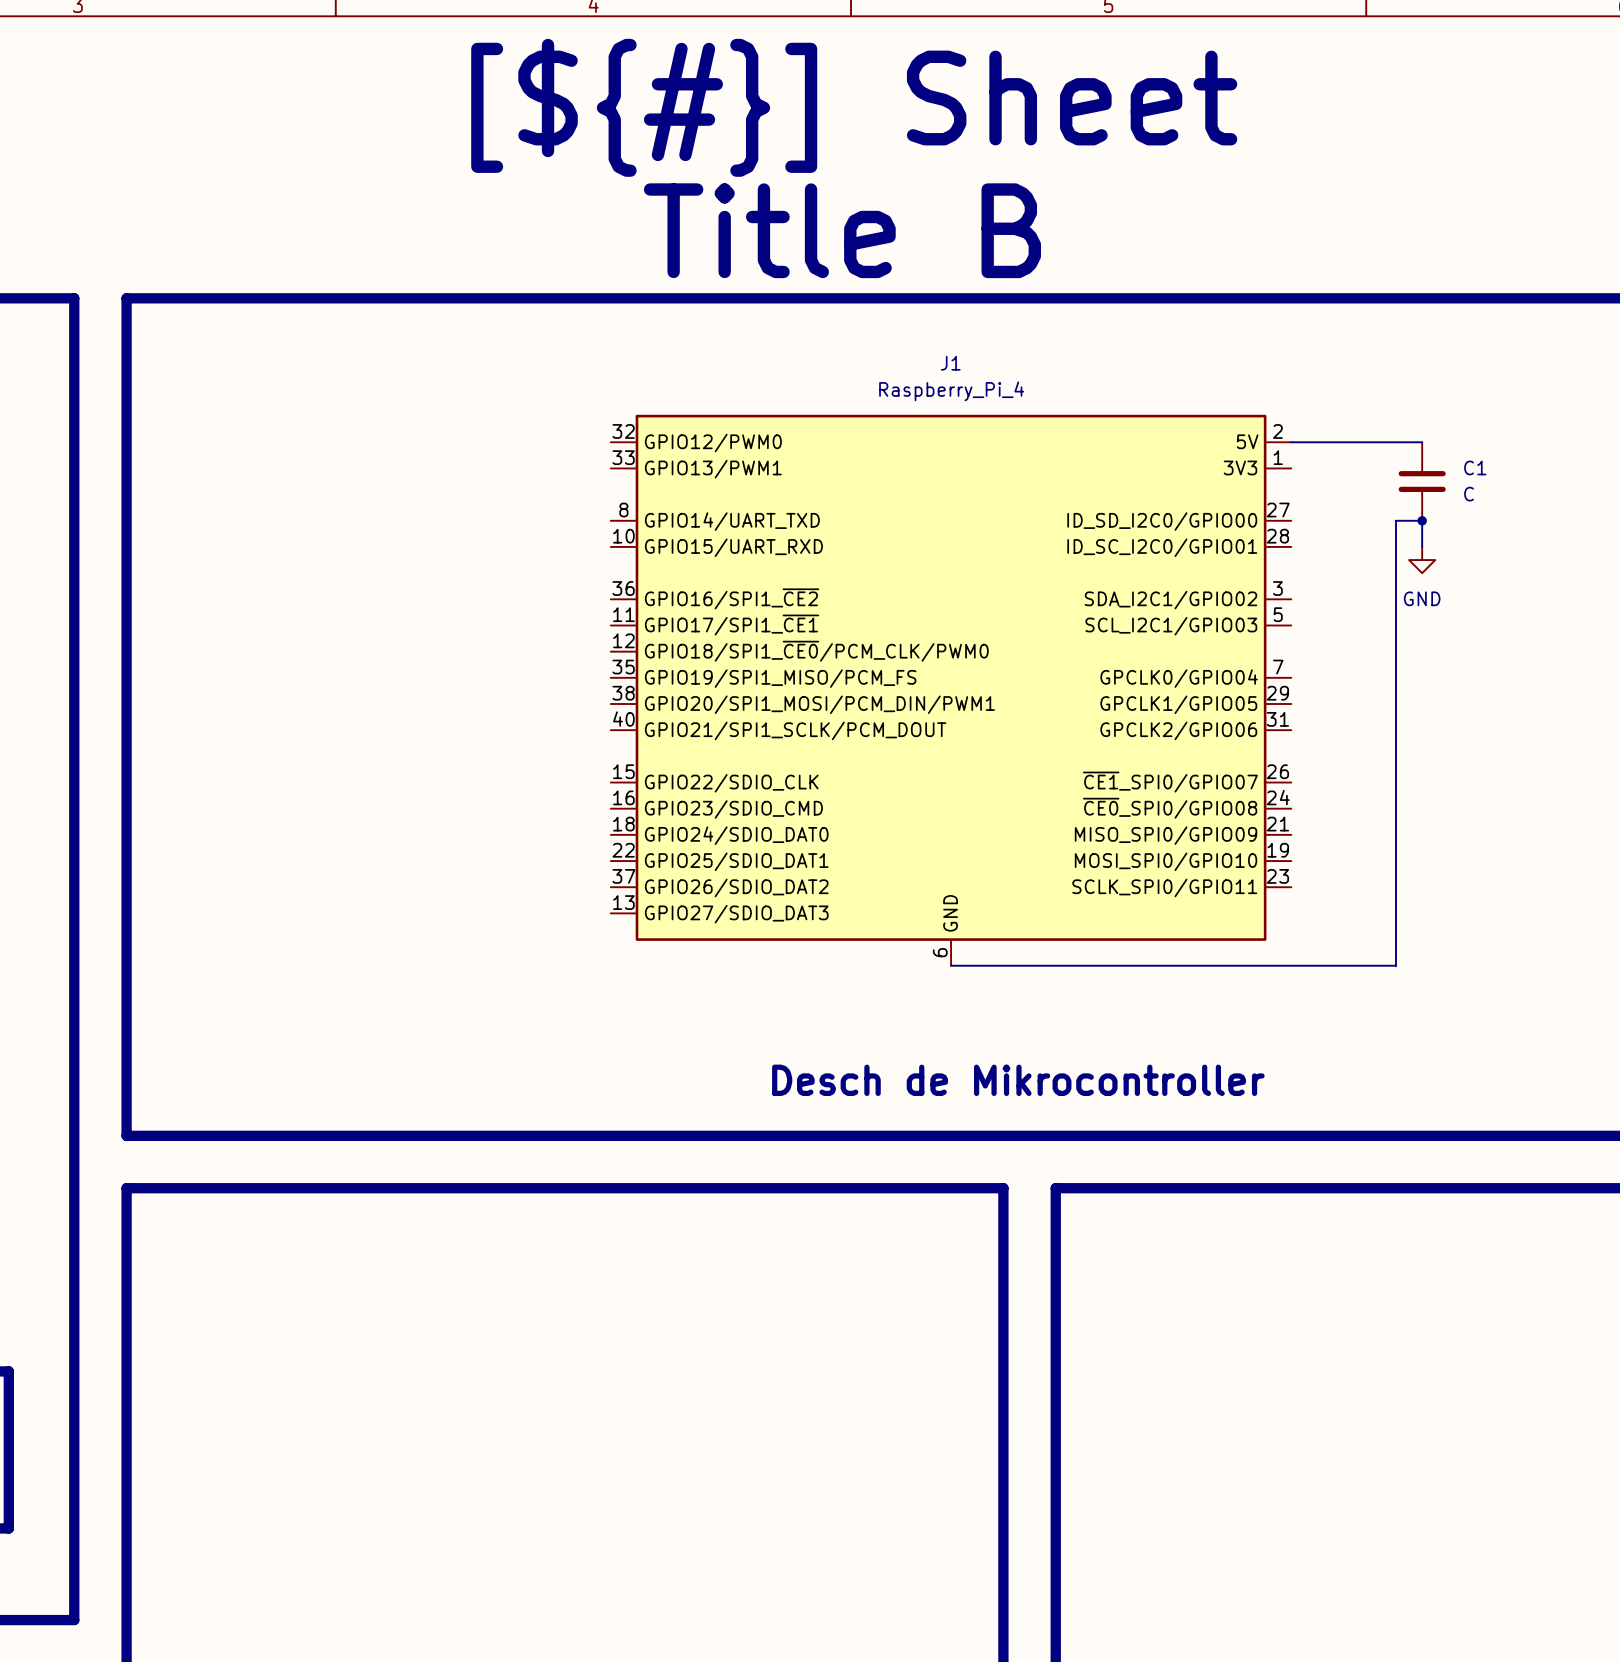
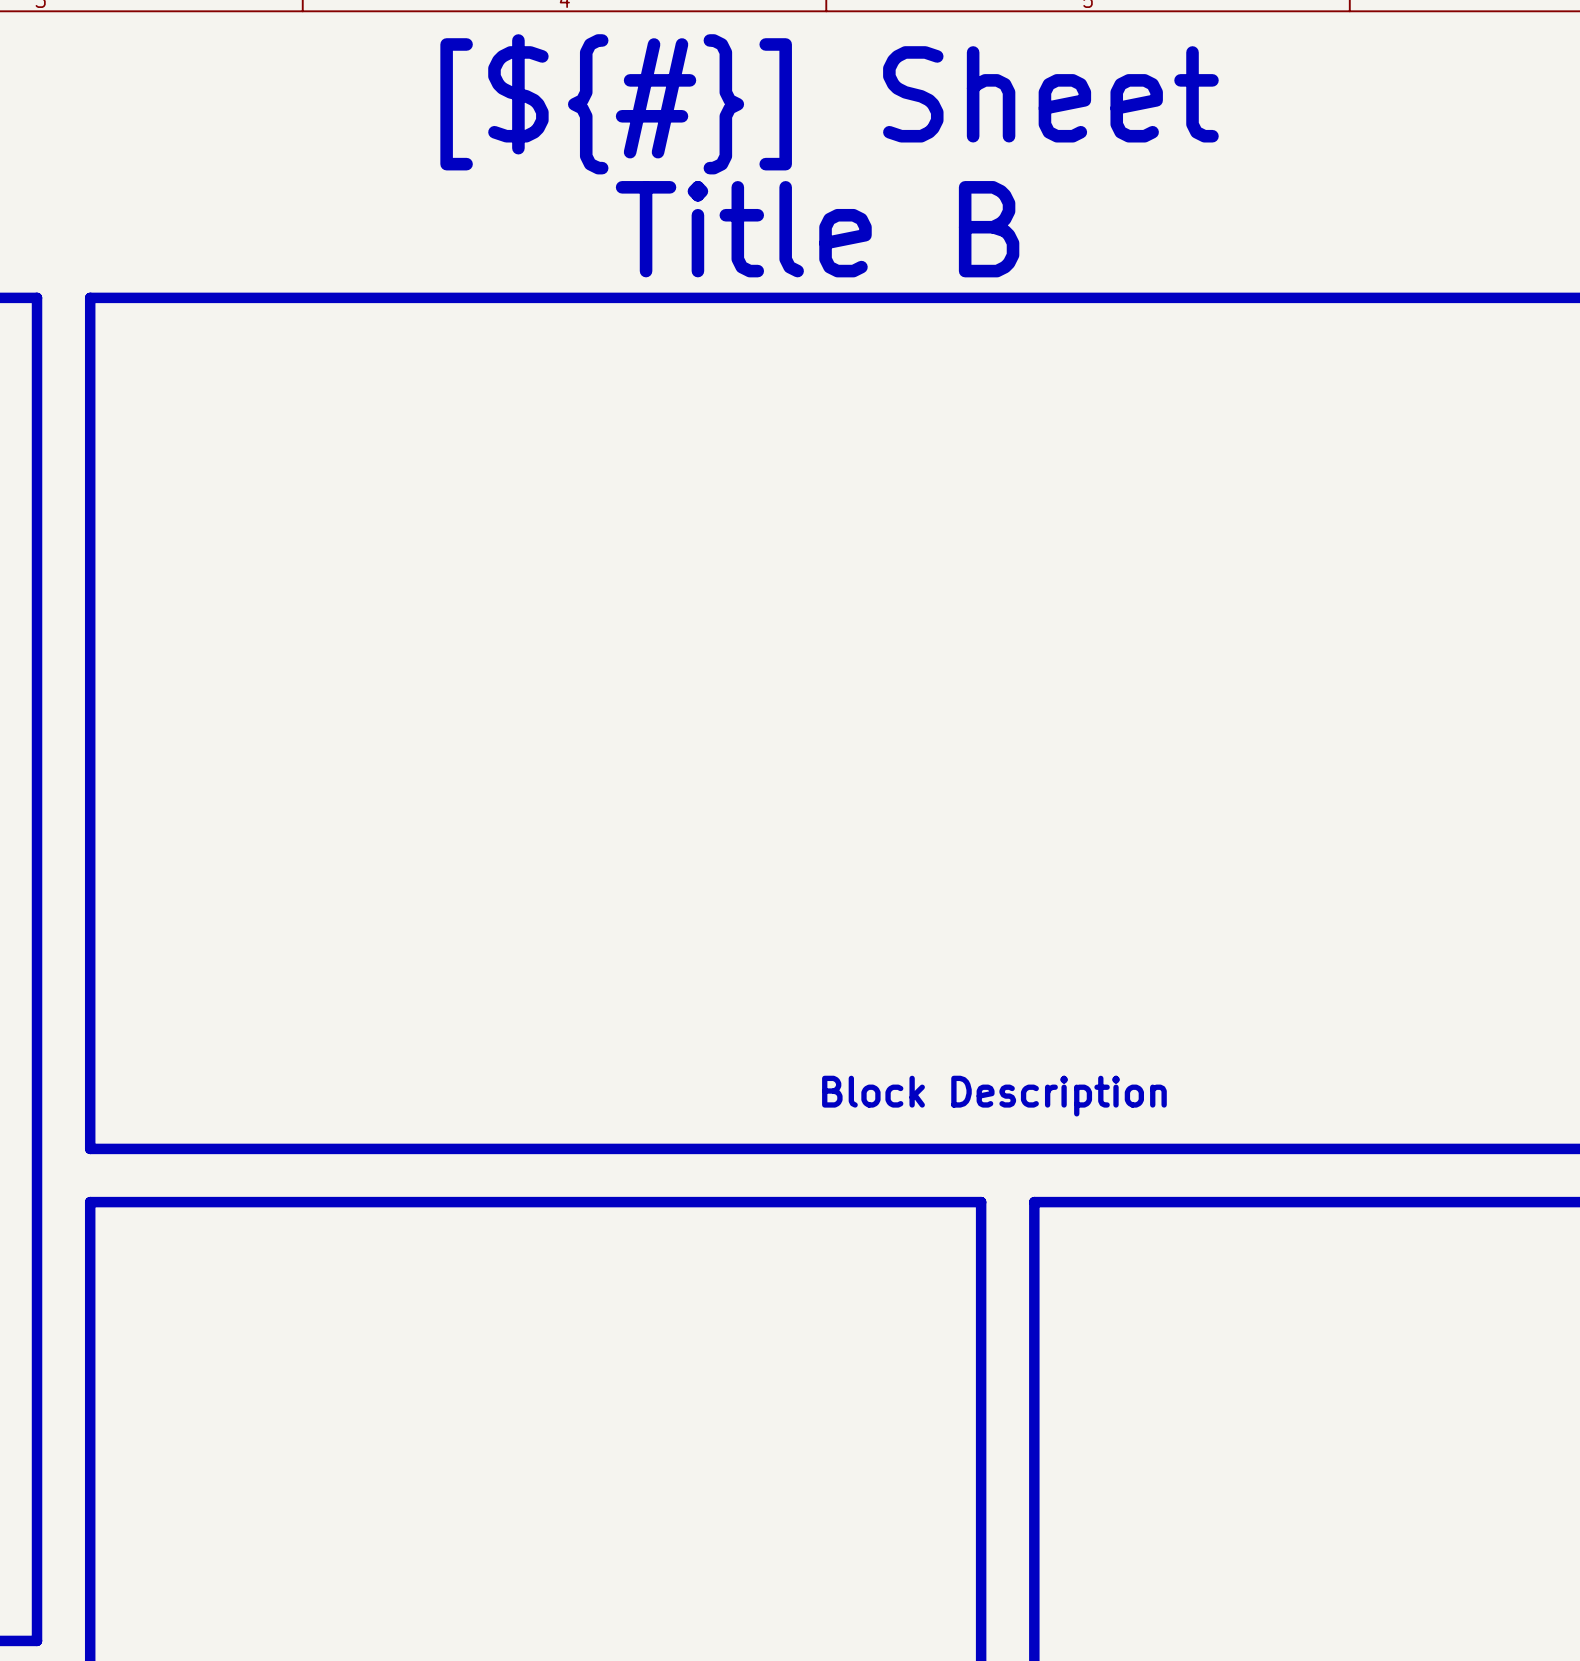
wire: (1291, 442) (1422, 442) -> none
C1: C (1422, 481) -> none
junction: (1422, 520) -> none
wire: (1422, 546) (1422, 520) (1396, 520) (1396, 965) (951, 965) -> none
power symbol: GND (1422, 560) -> none
J1: Raspberry_Pi_4 (951, 690) -> none
text: Desch de Mikrocontroller (1018, 1080) -> Block Description (994, 1096)

